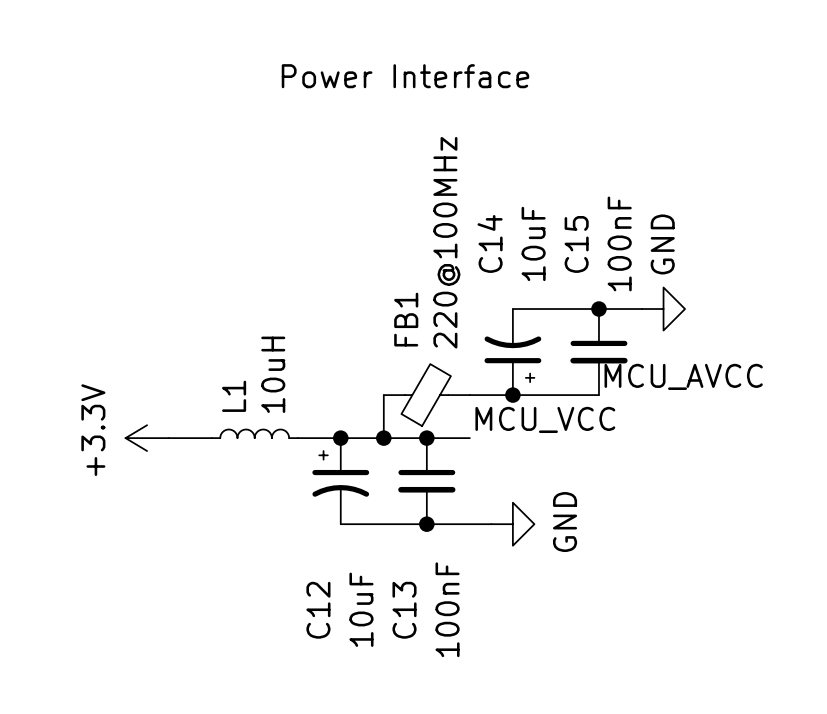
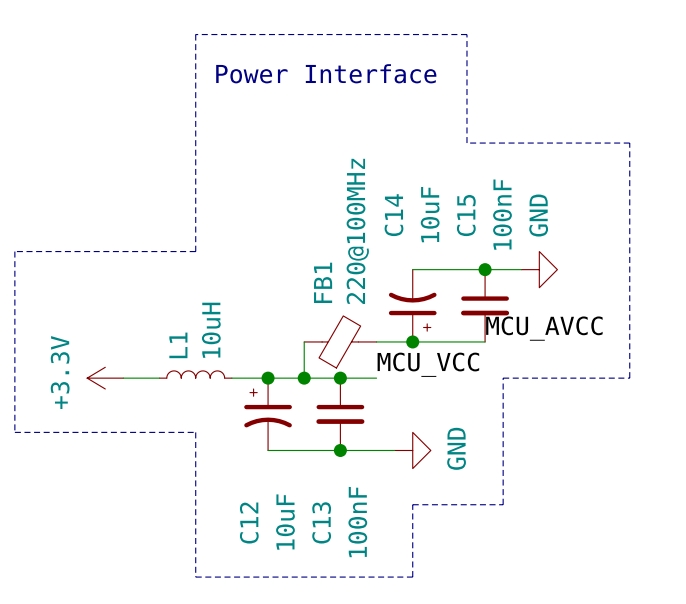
line: none -> (195, 34) (195, 251) (14, 251) (14, 432) (195, 432) (195, 577) (412, 577) (412, 504) (503, 504) (503, 378) (629, 378) (629, 143) (466, 143) (466, 34) (195, 34)

